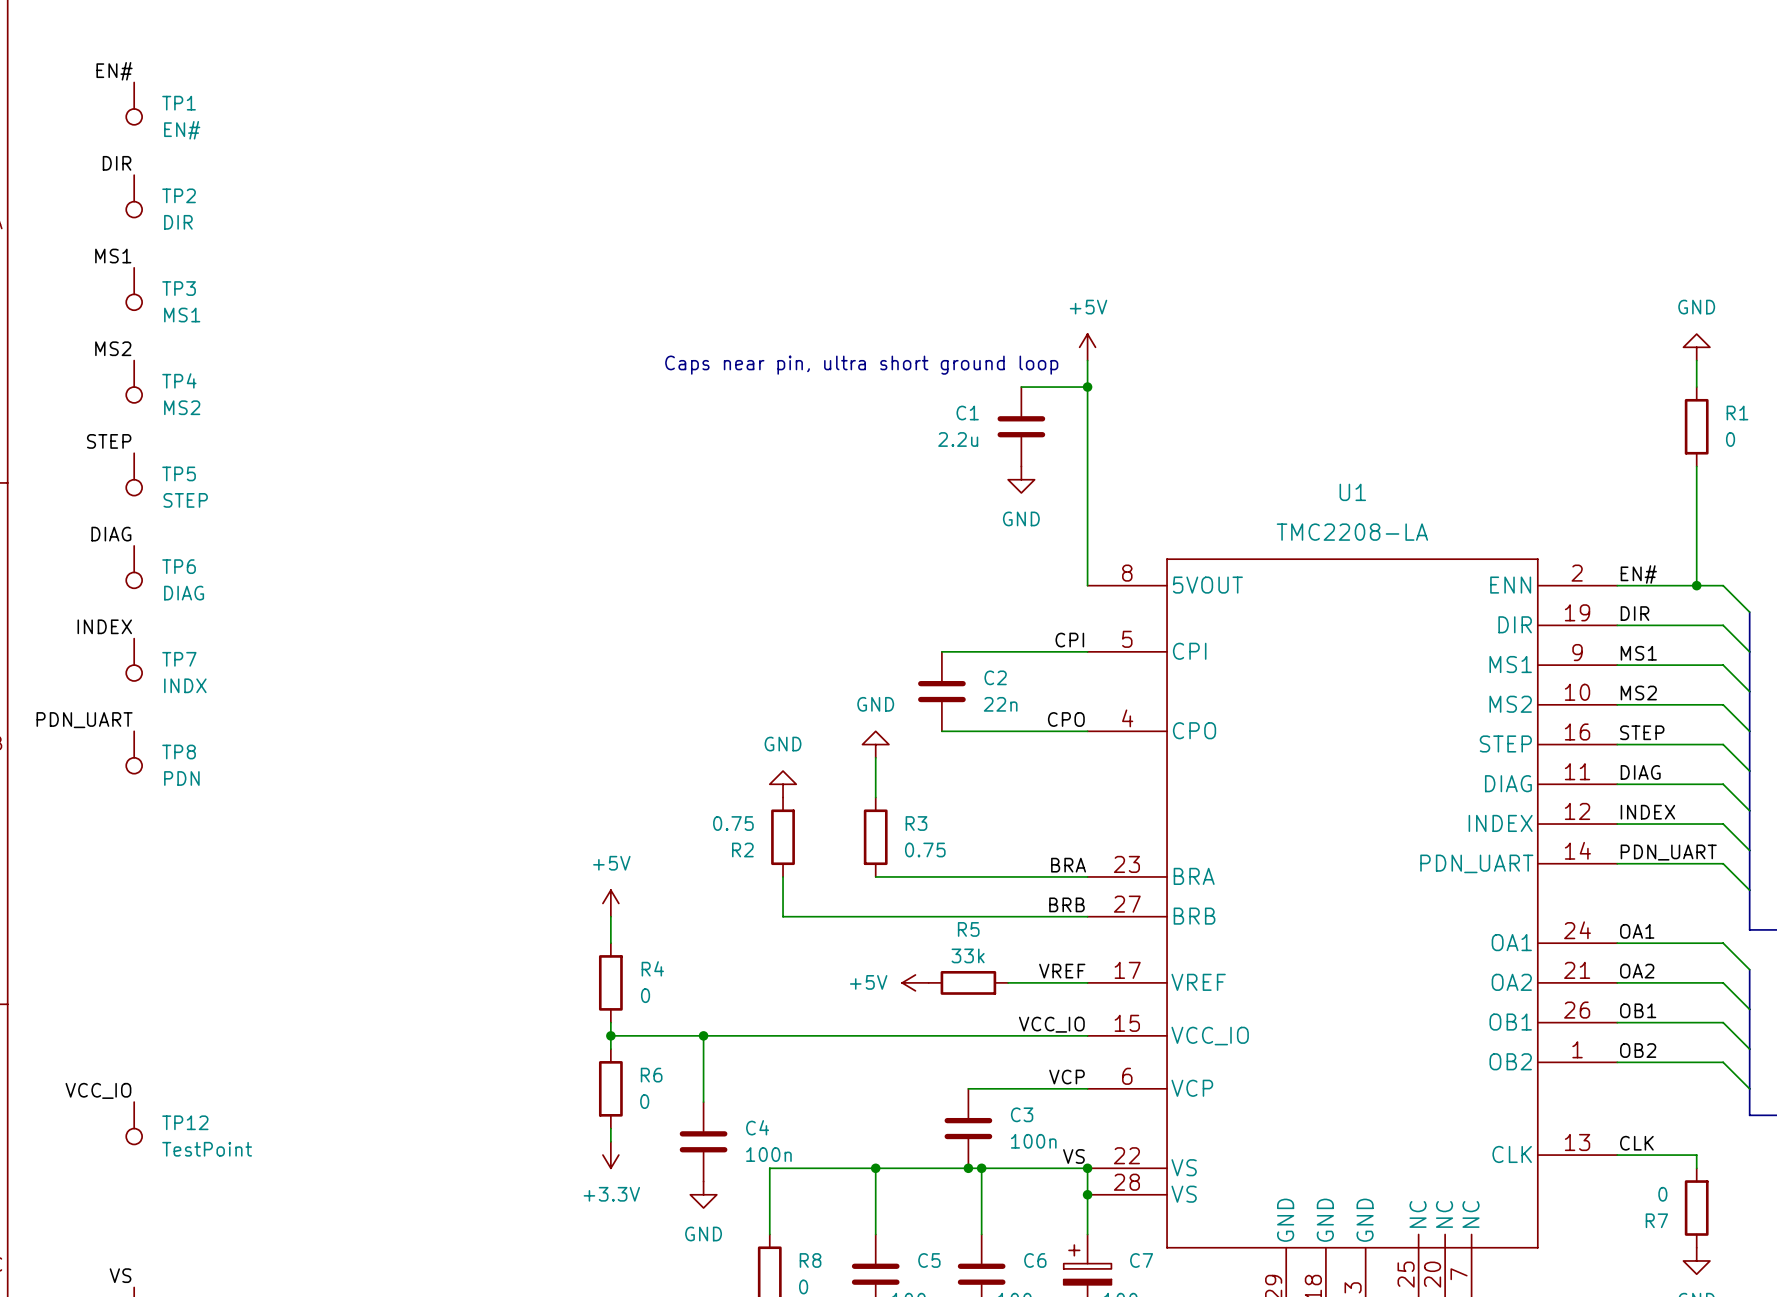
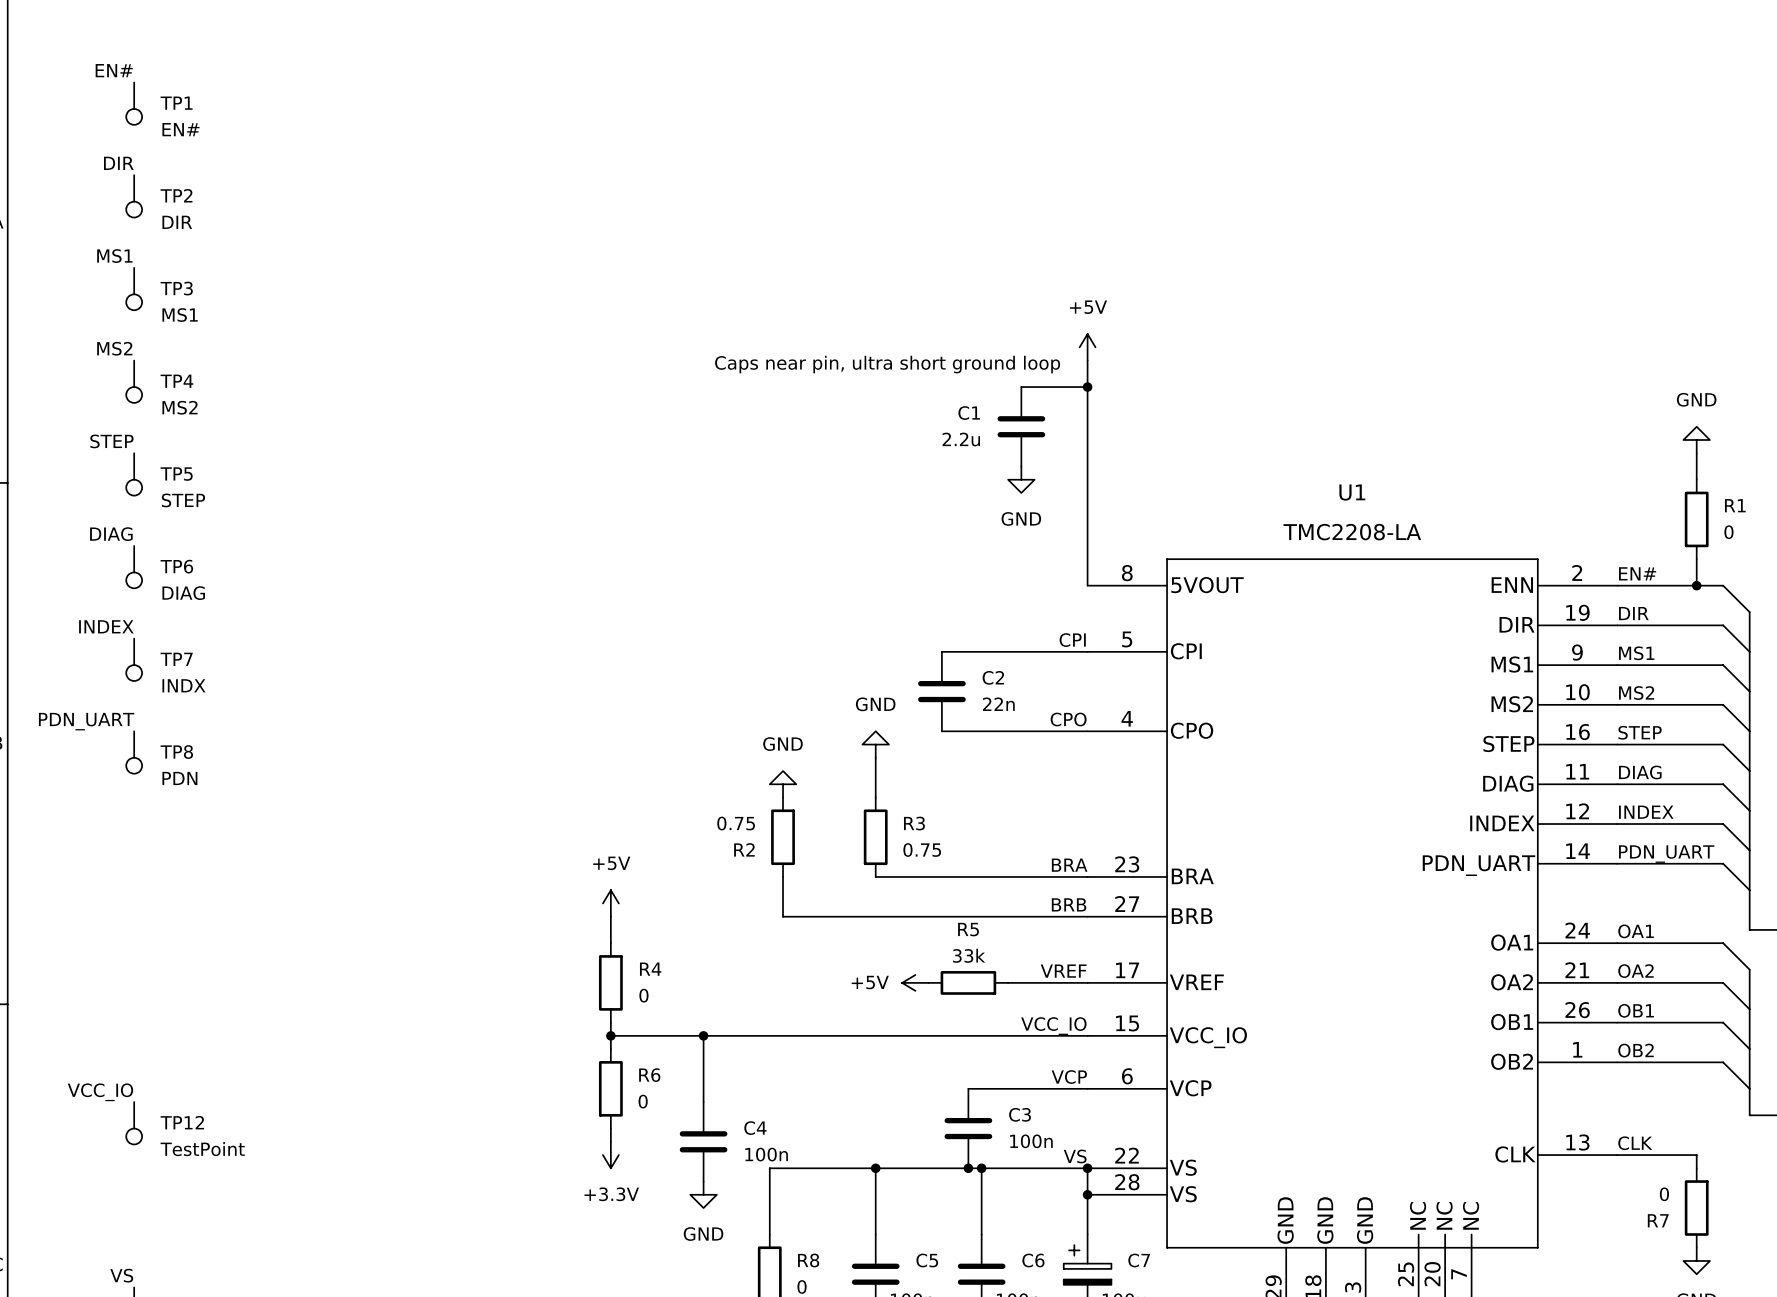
power symbol position: GND (1696, 347) -> GND (1696, 440)
wire: (1696, 360) (1696, 387) -> none
R1 position: (1696, 426) -> (1696, 519)
wire: (1696, 479) (1696, 559) -> none

